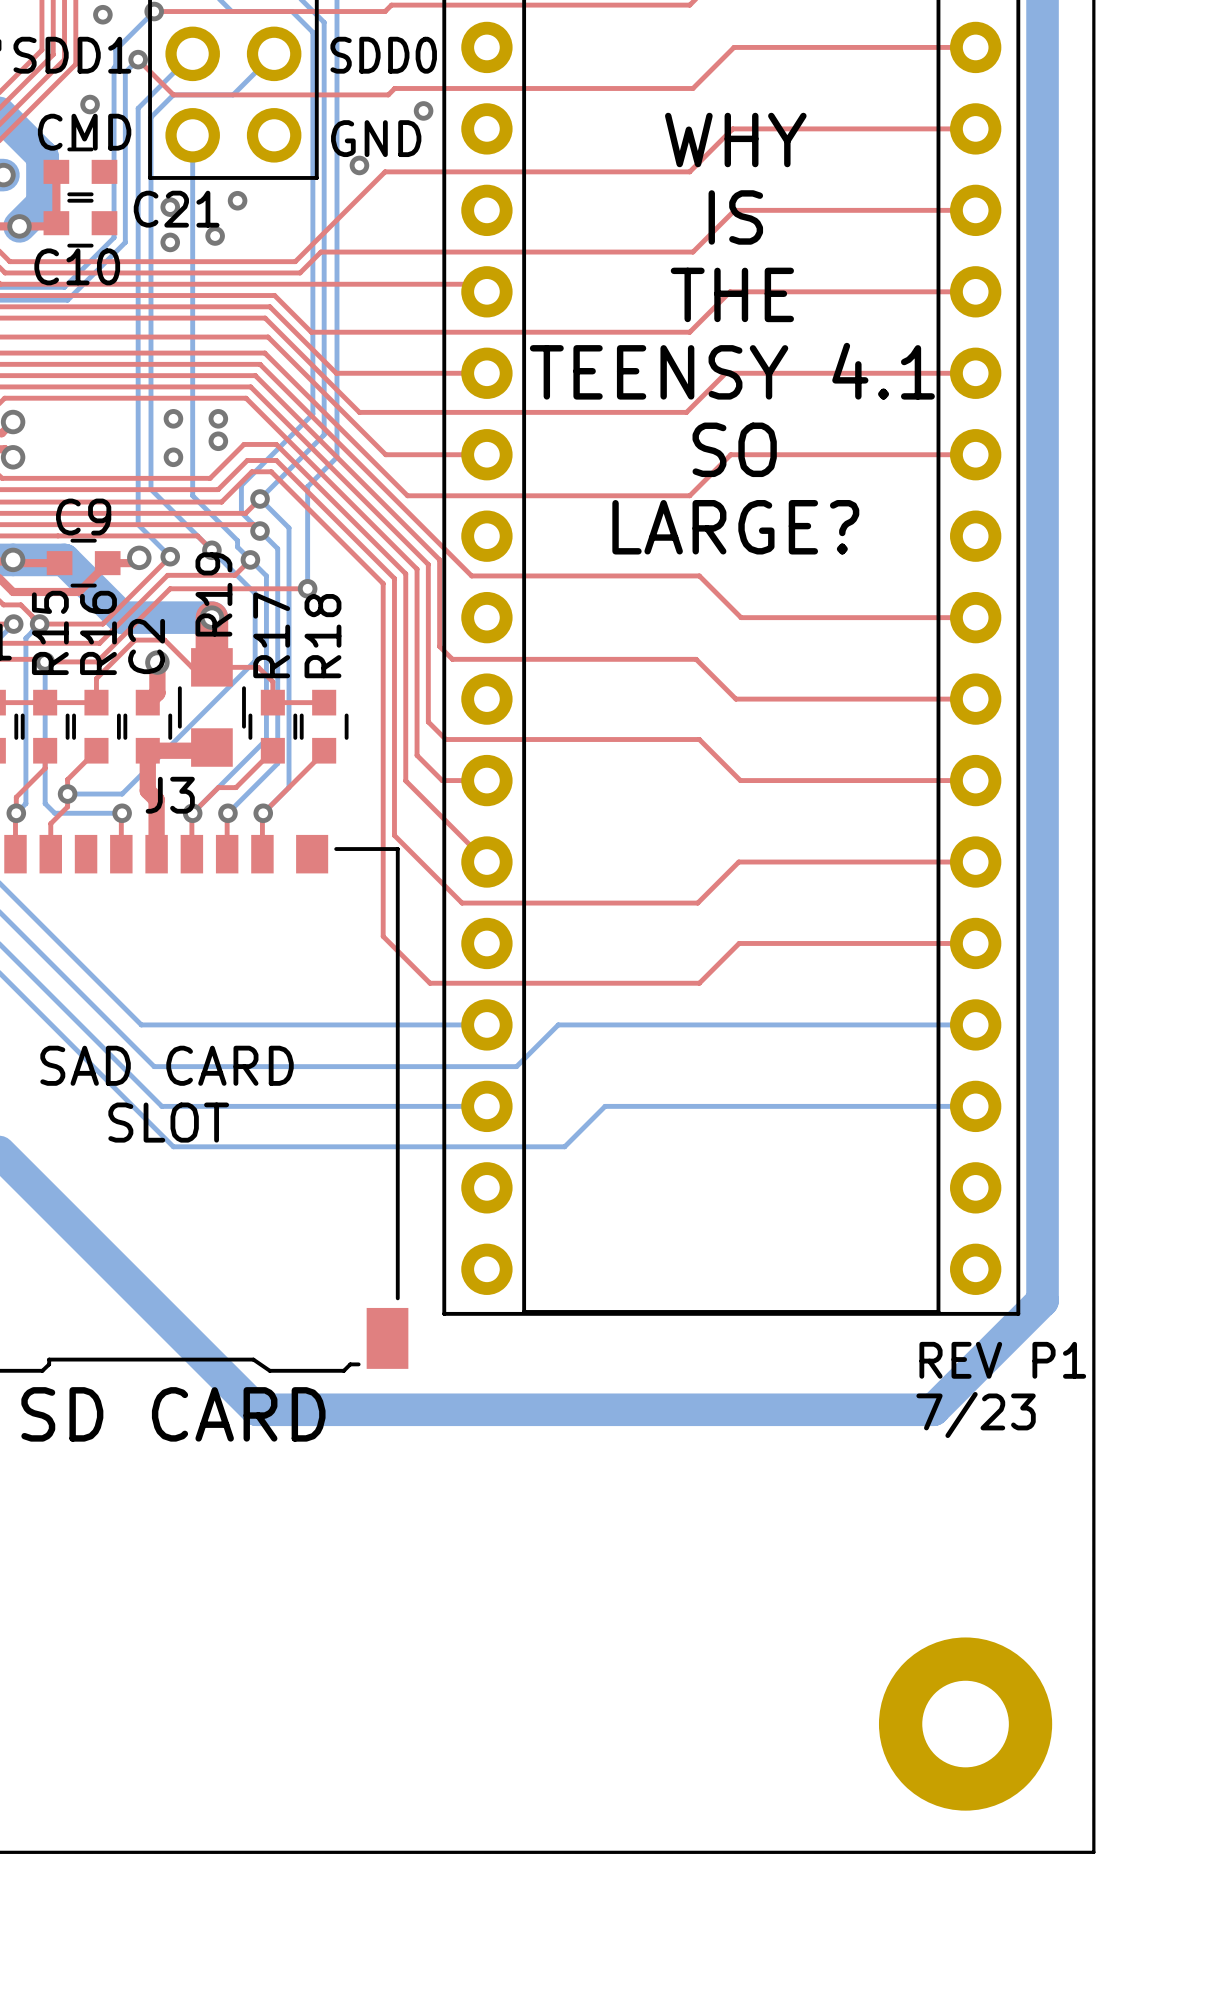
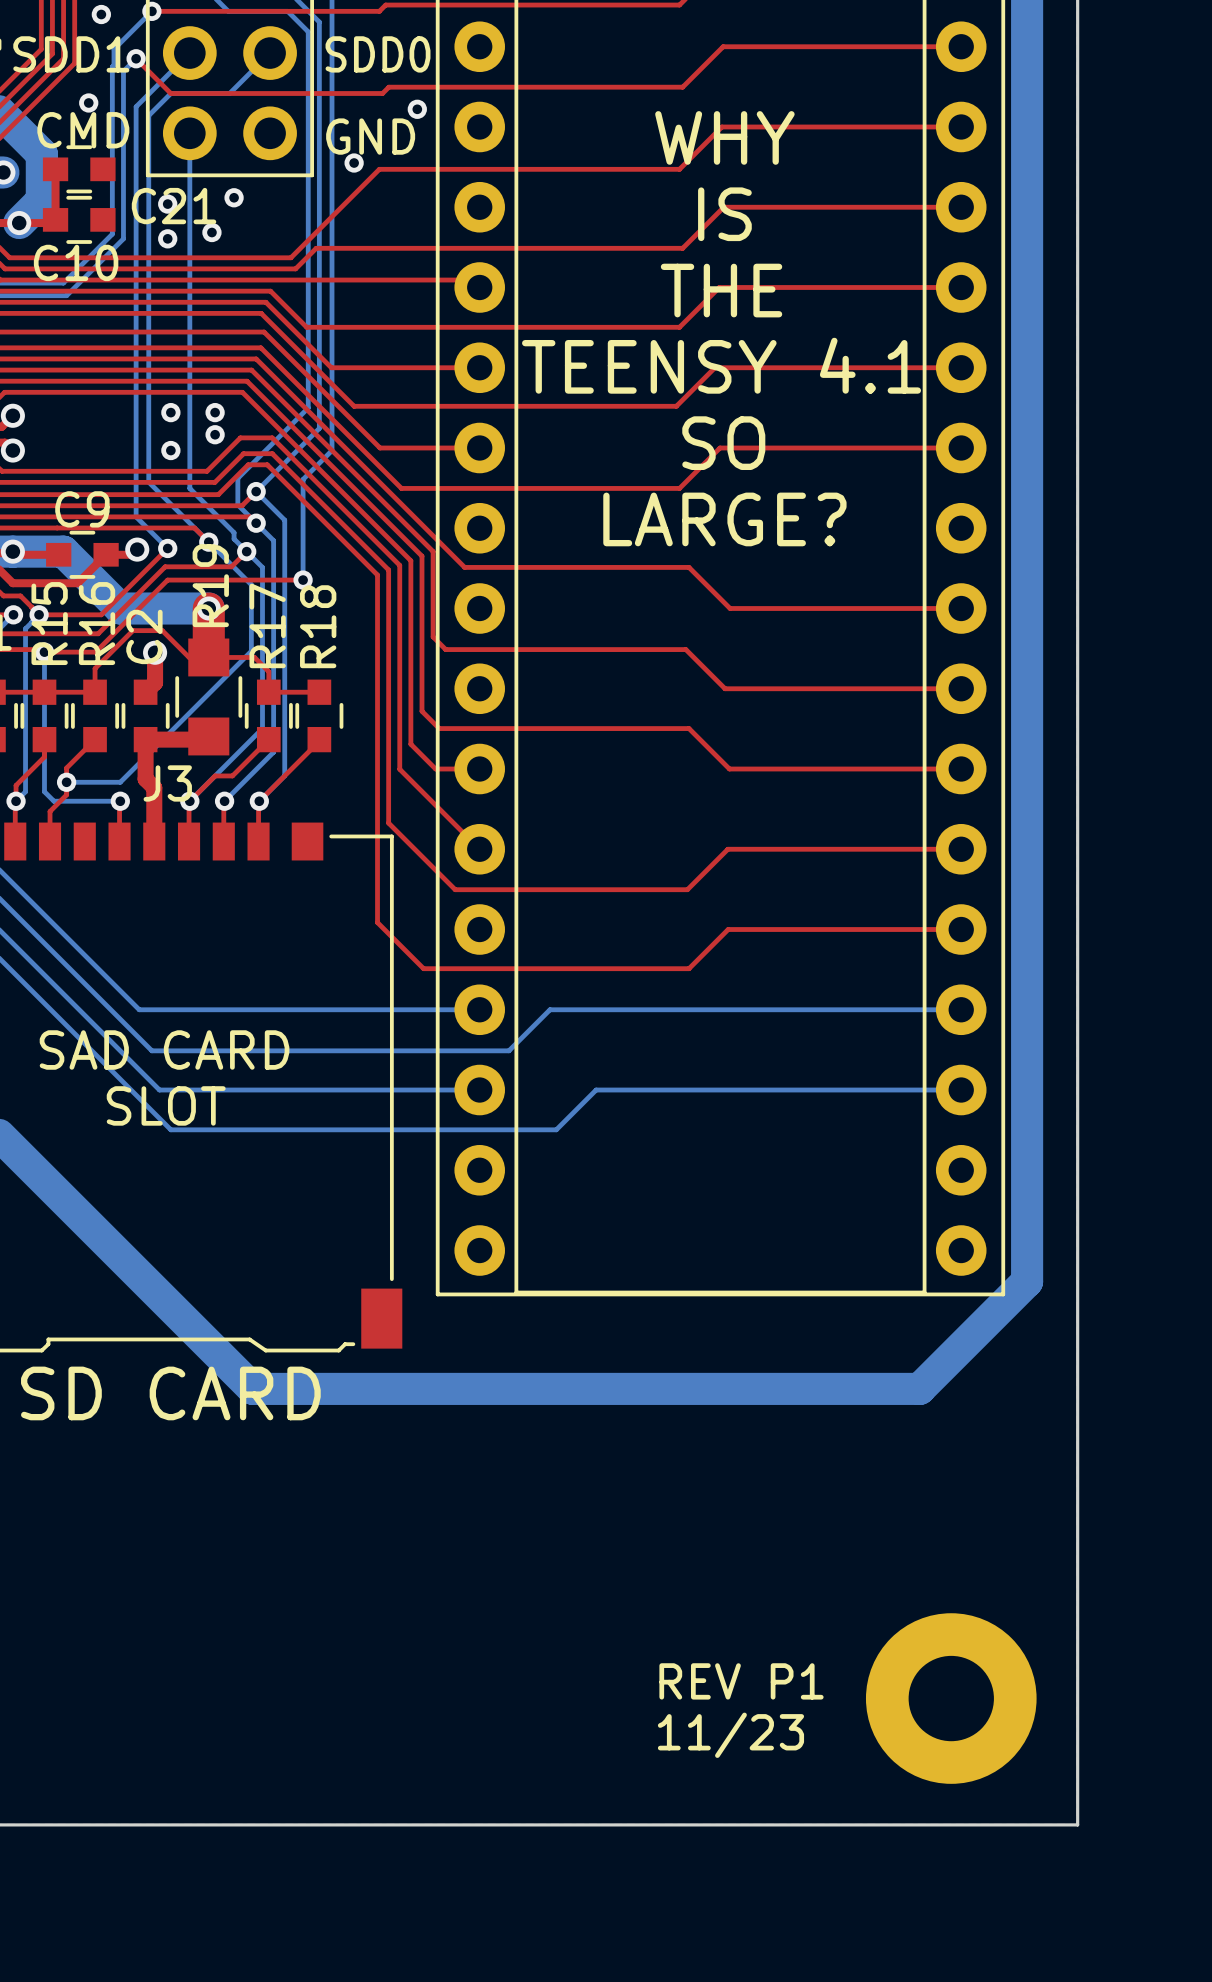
text position: REV P1 (1002, 1360) -> REV P1 (741, 1681)
text: 7/23 (976, 1414) -> none
text: none -> 11/23 (730, 1735)

